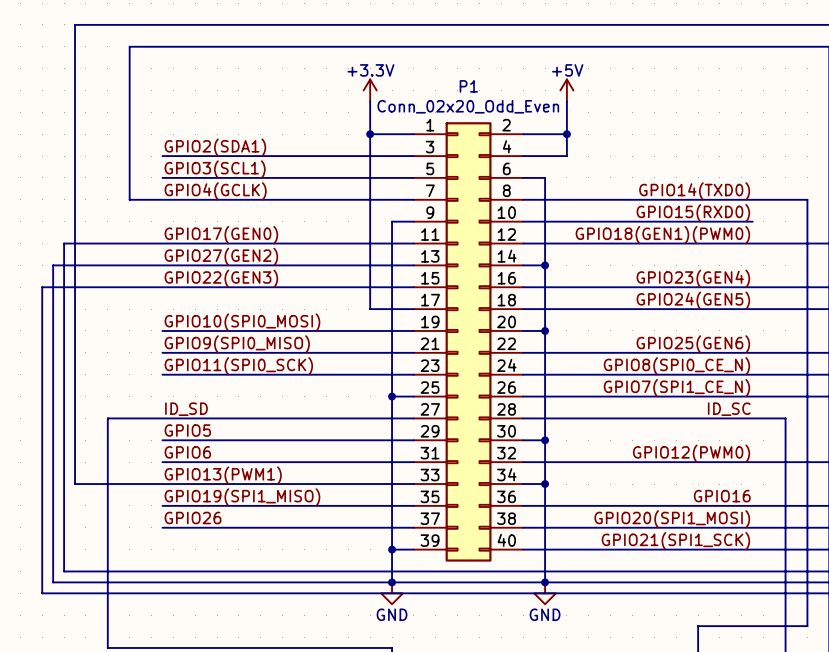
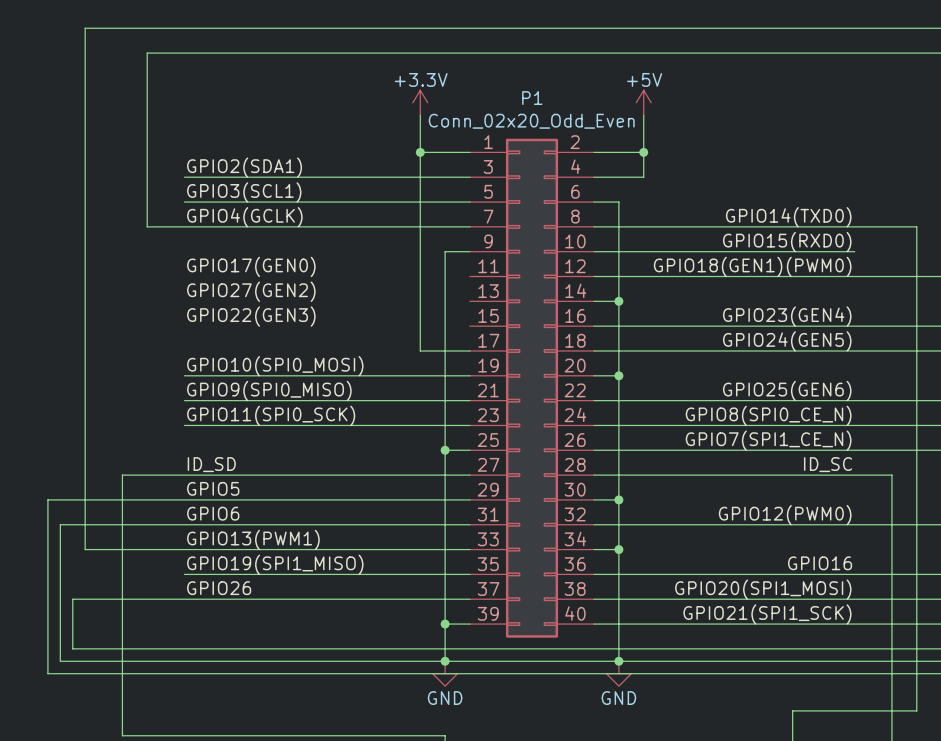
wire: (413, 243) (64, 243) (64, 527) -> (184, 599) (72, 599)
wire: (413, 265) (53, 265) (53, 462) -> (184, 524) (60, 524)
wire: (413, 287) (42, 287) (42, 440) -> (184, 499) (47, 499)

